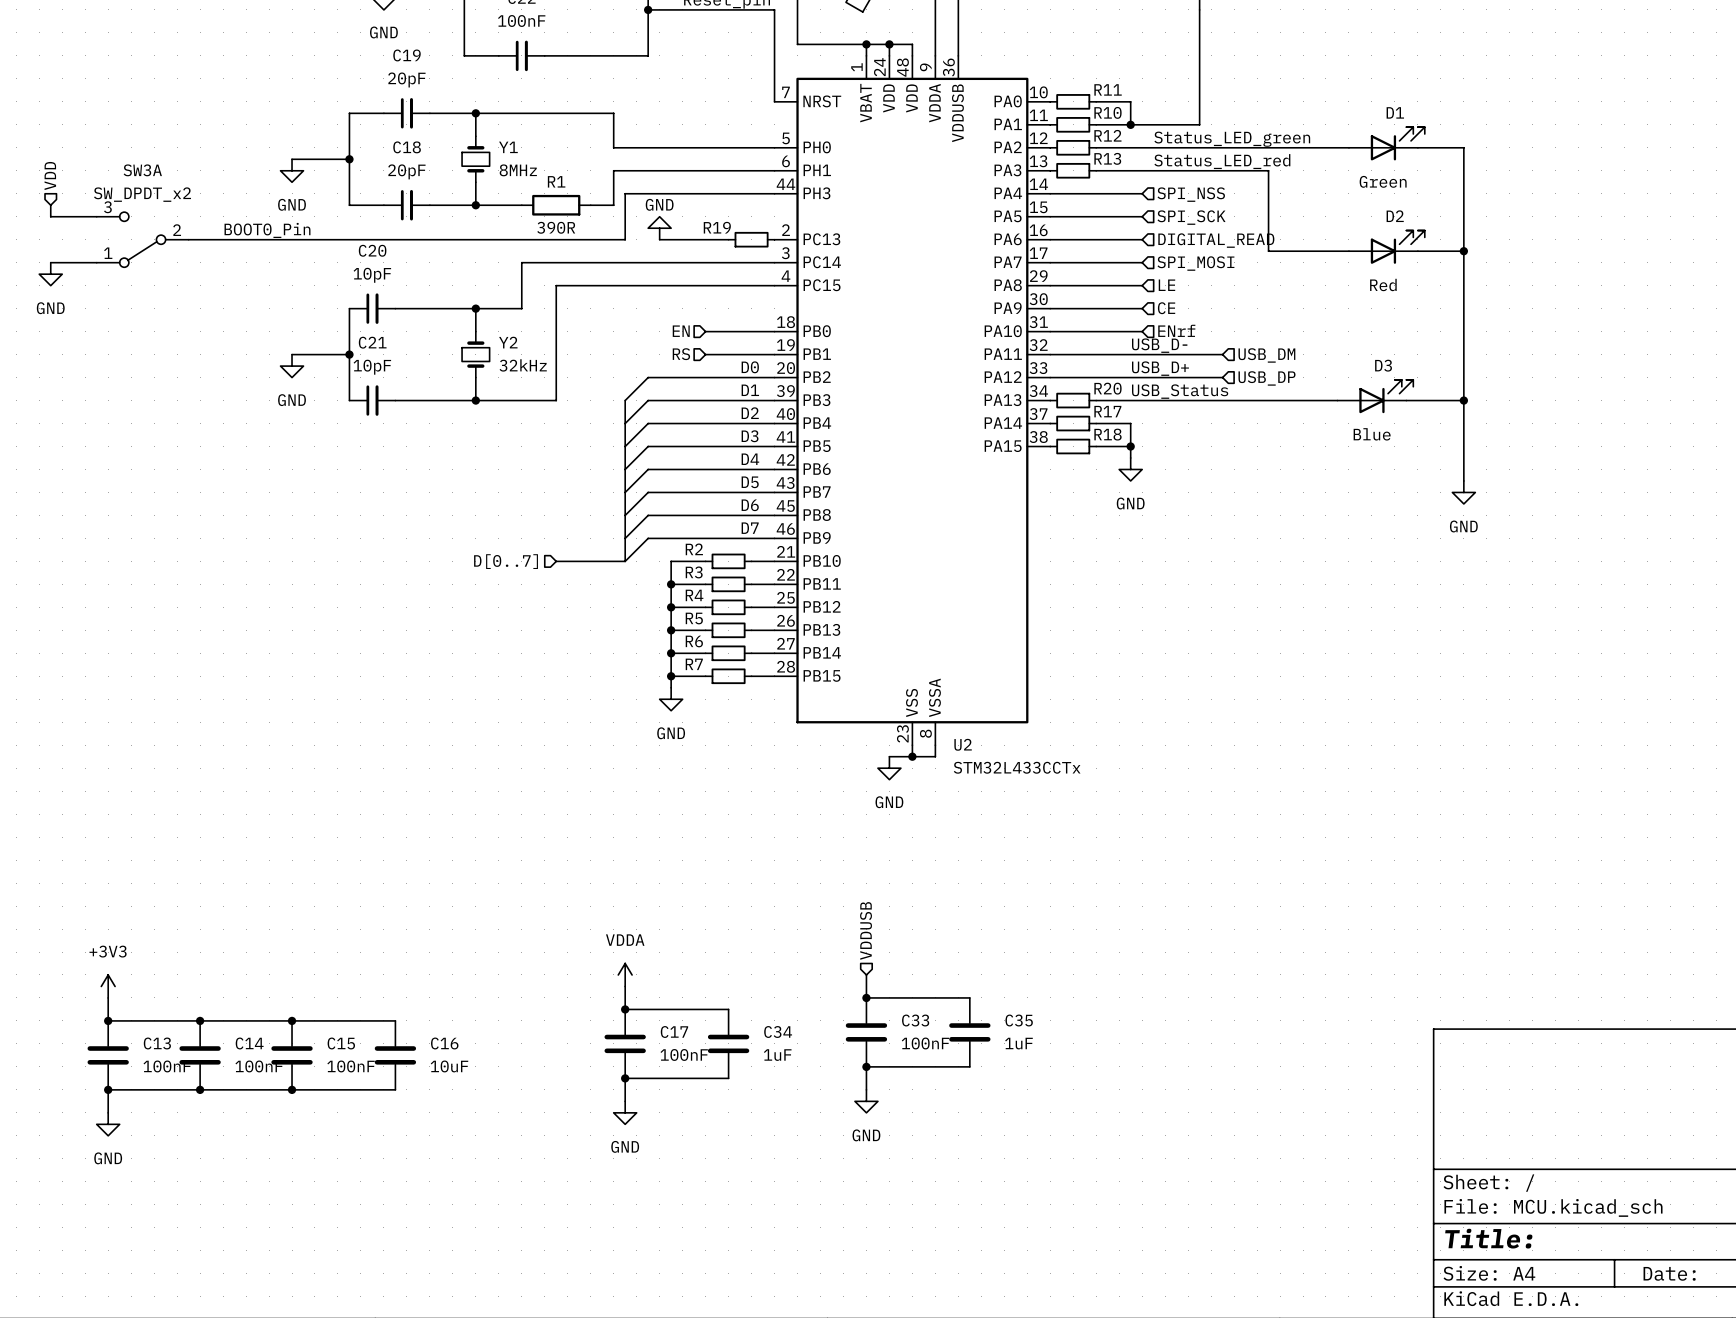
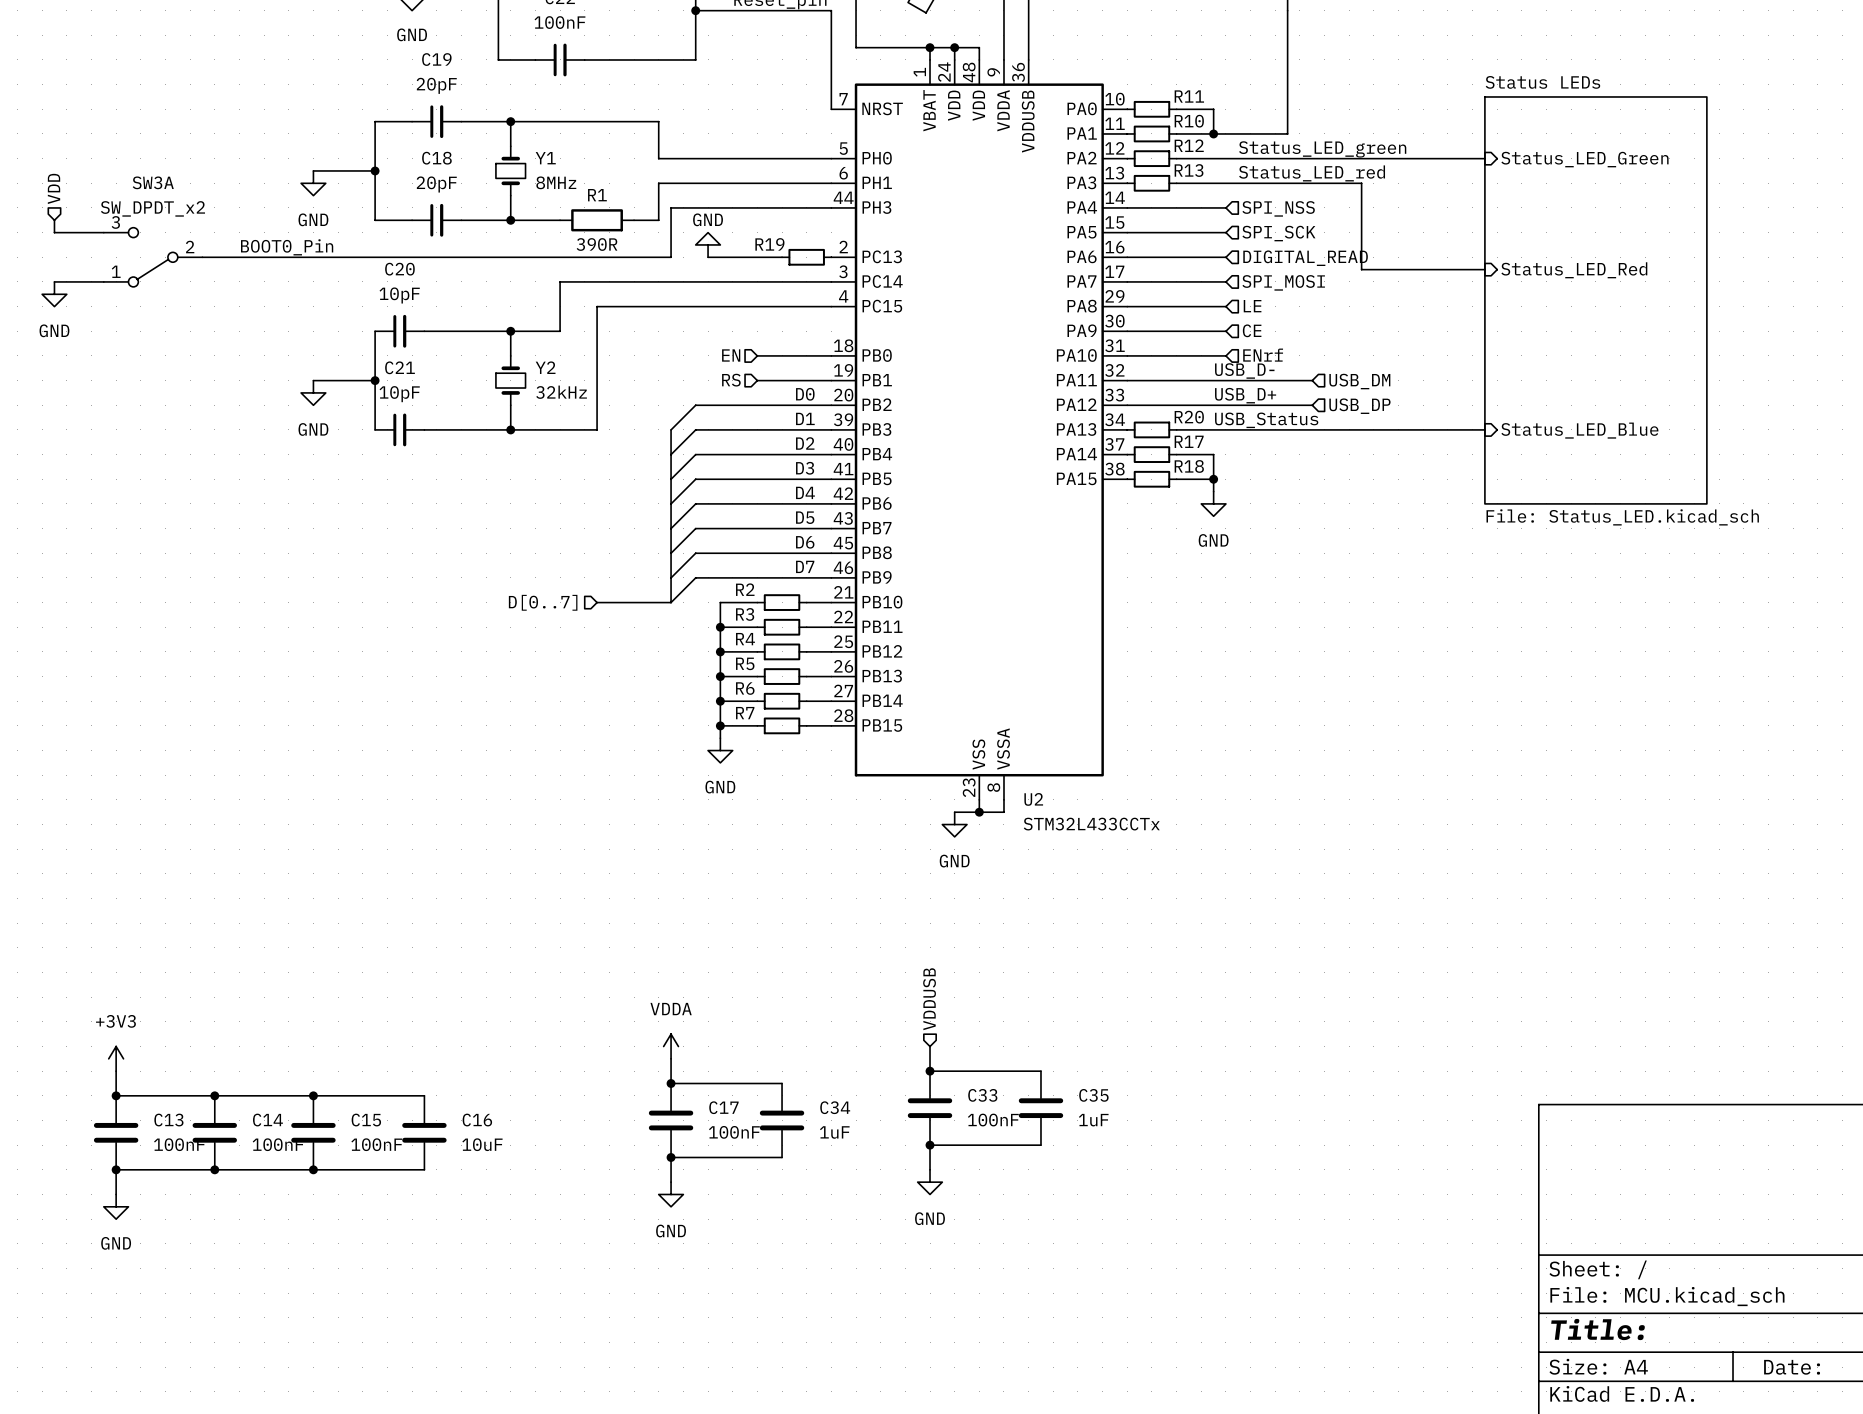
D1: Green (1386, 143) -> none
wire: (1417, 147) (1463, 147) (1463, 480) -> none
sheet pin: none -> Status_LED_Green (1584, 159)
D2: Red (1386, 247) -> none
junction: (1463, 251) -> none
sheet pin: none -> Status_LED_Red (1574, 270)
sheet Status LEDs: none -> File: Status_LED.kicad_sch (1595, 300)
D3: Blue (1375, 396) -> none
wire: (1406, 400) (1463, 400) -> none
junction: (1463, 400) -> none
sheet pin: none -> Status_LED_Blue (1579, 430)
power symbol: GND (1463, 492) -> none

